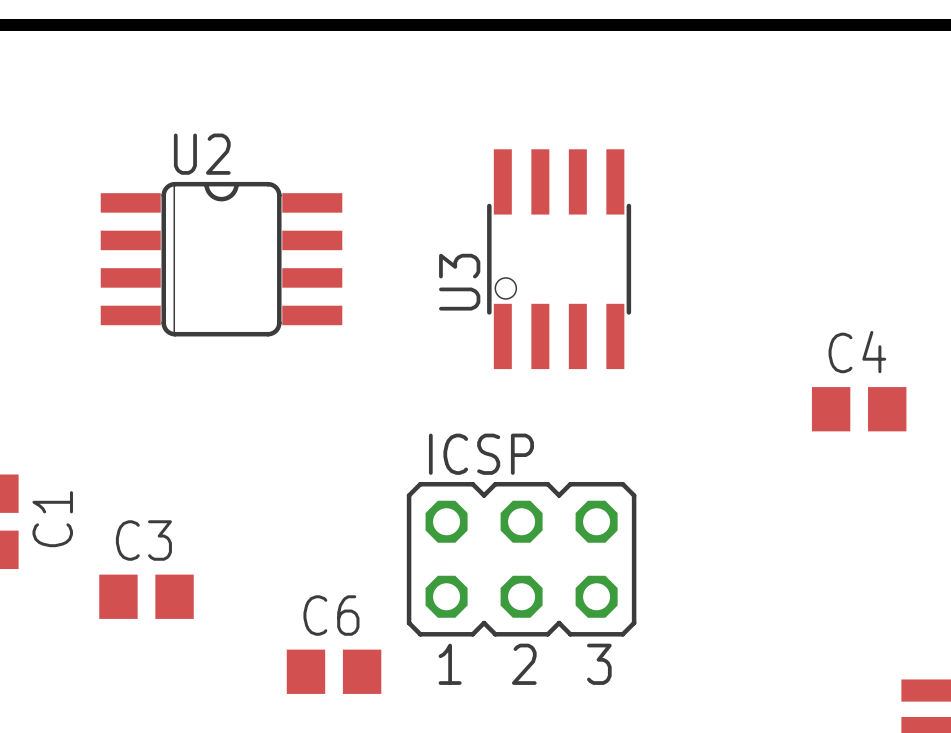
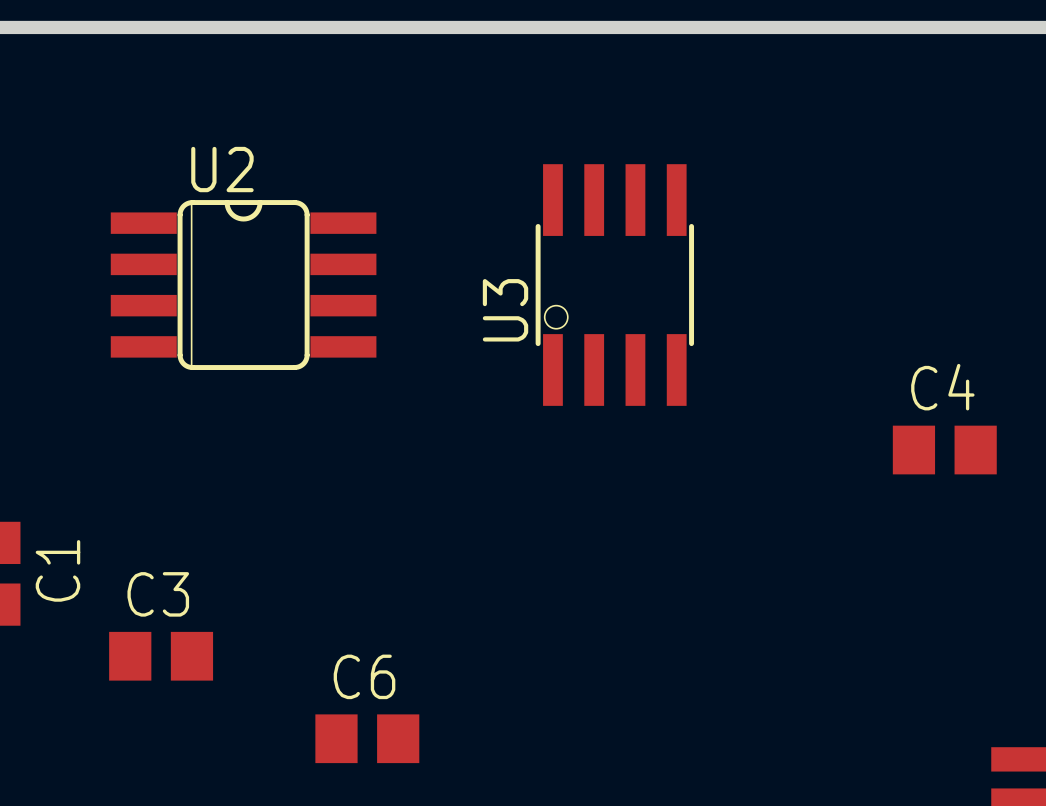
ICSP: (521, 559) -> none

